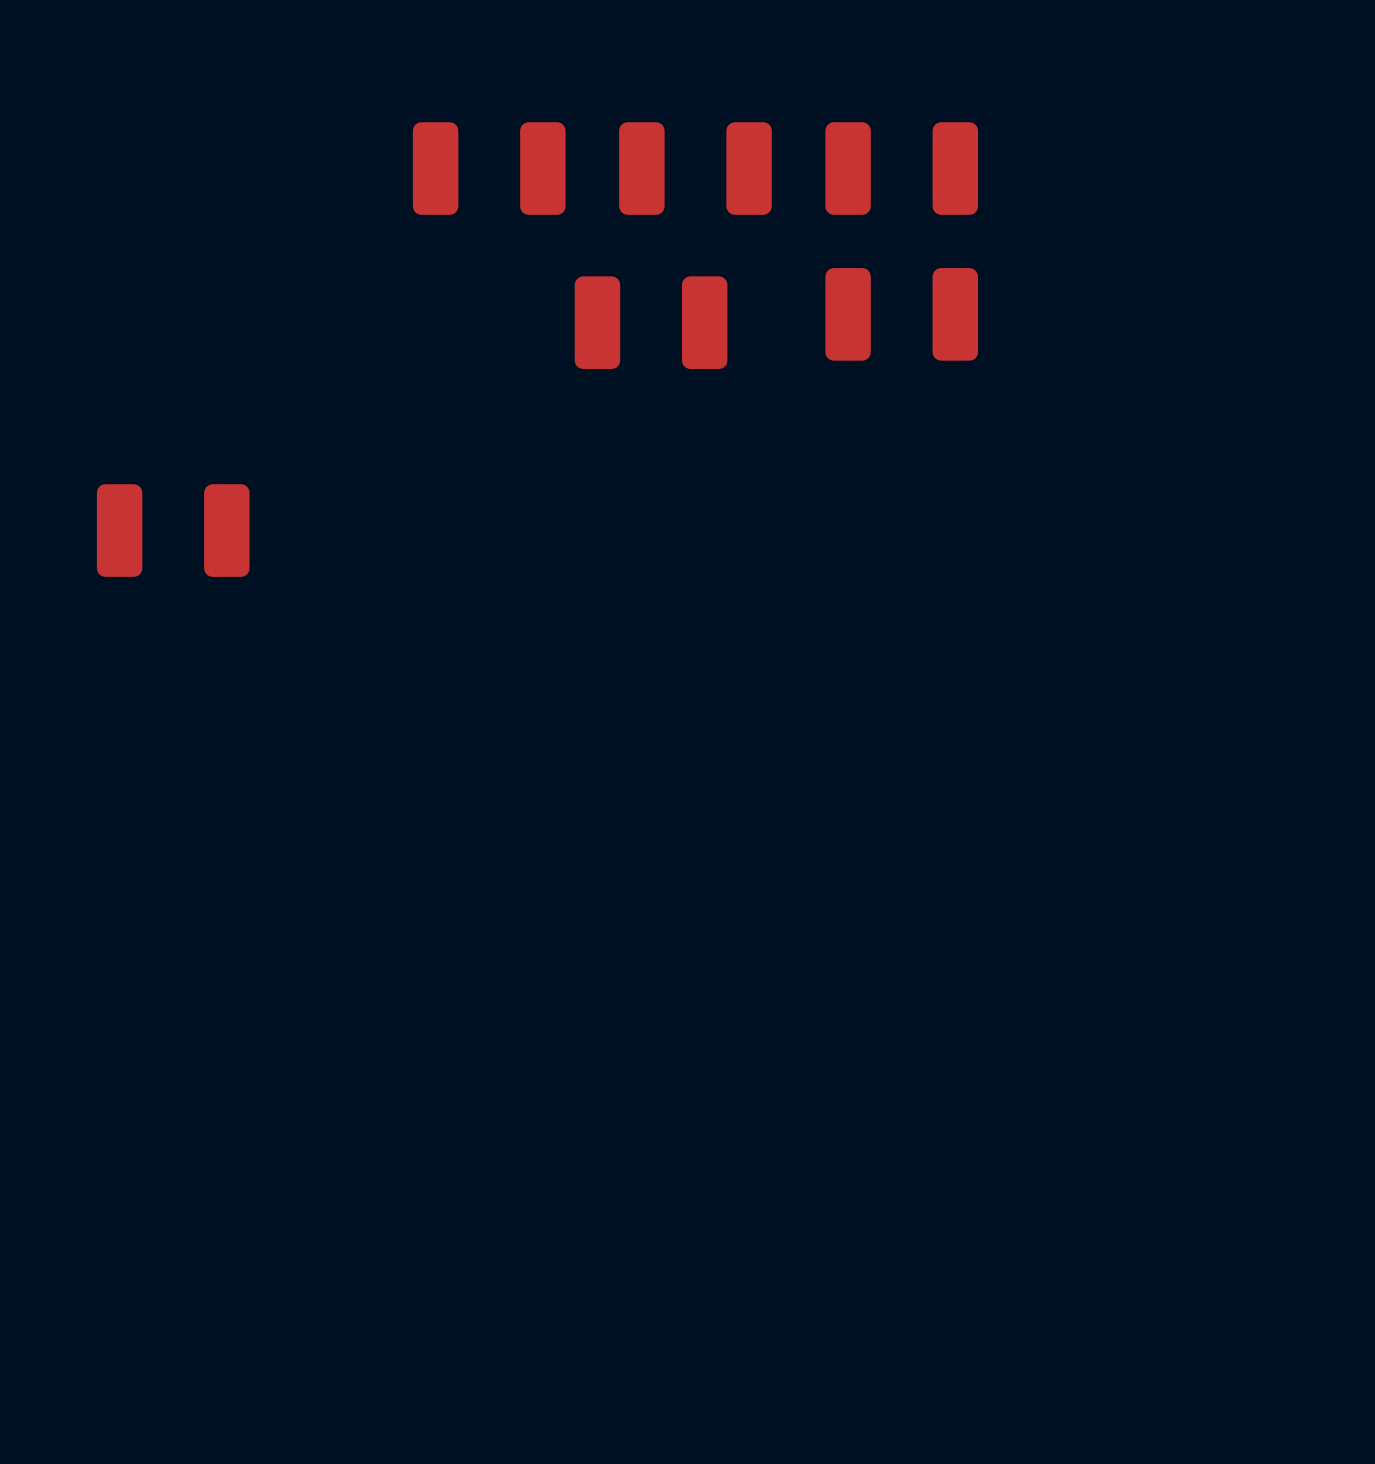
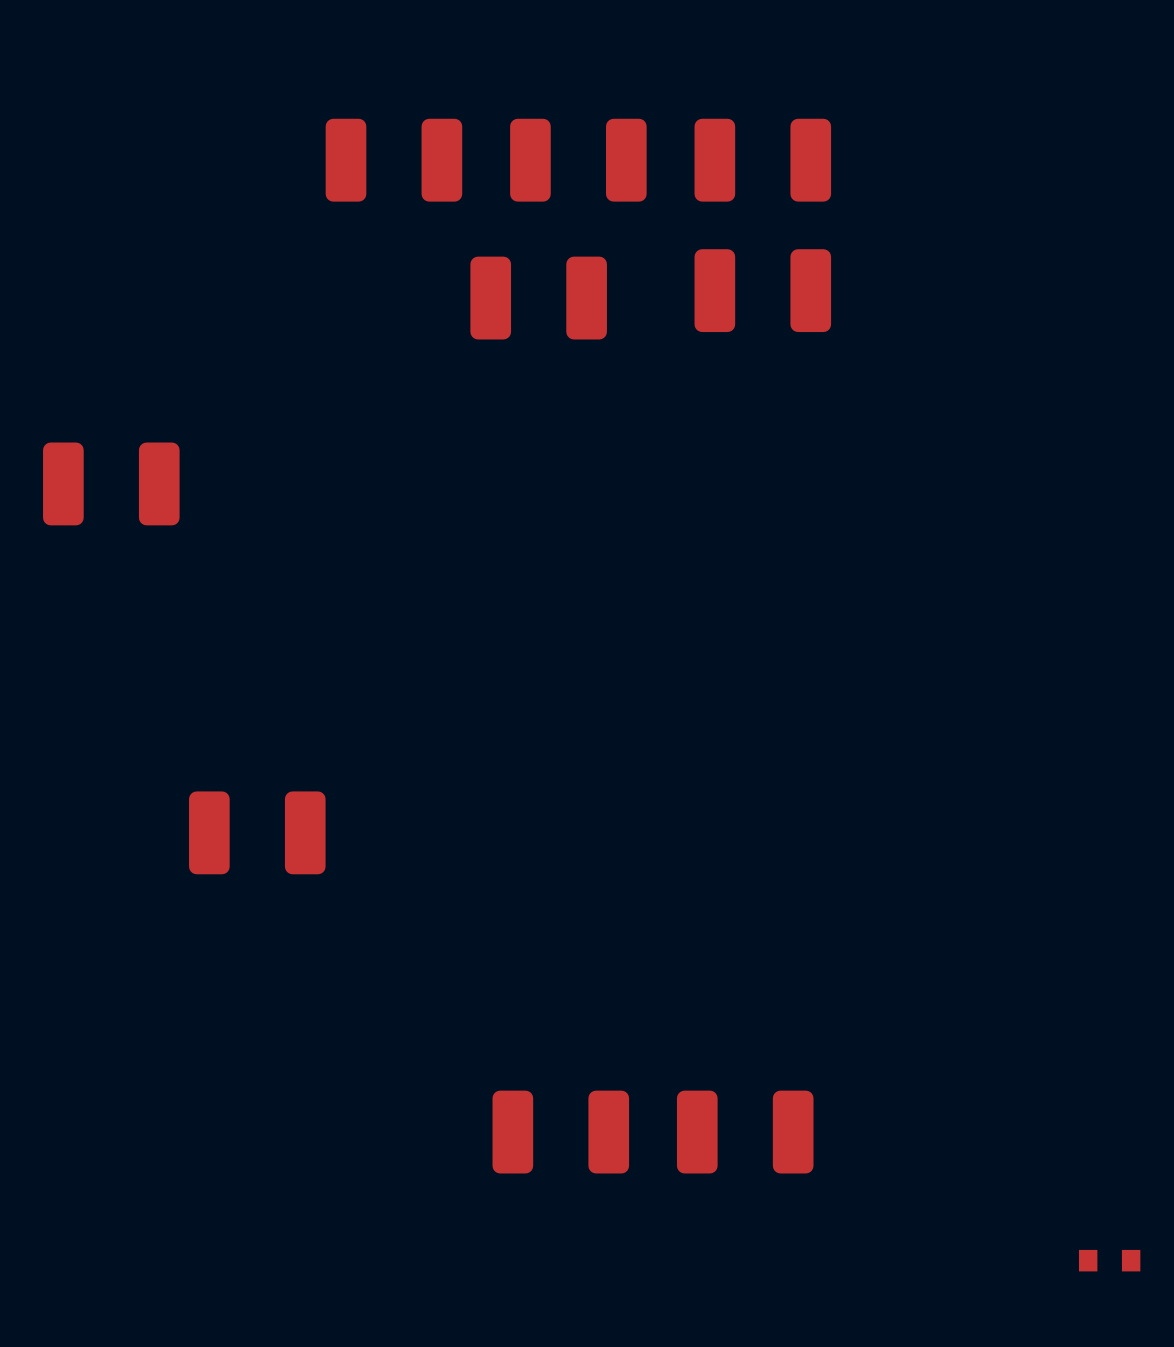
part: none -> (257, 832)
part: none -> (560, 1132)
part: none -> (745, 1132)
part: none -> (1109, 1260)

